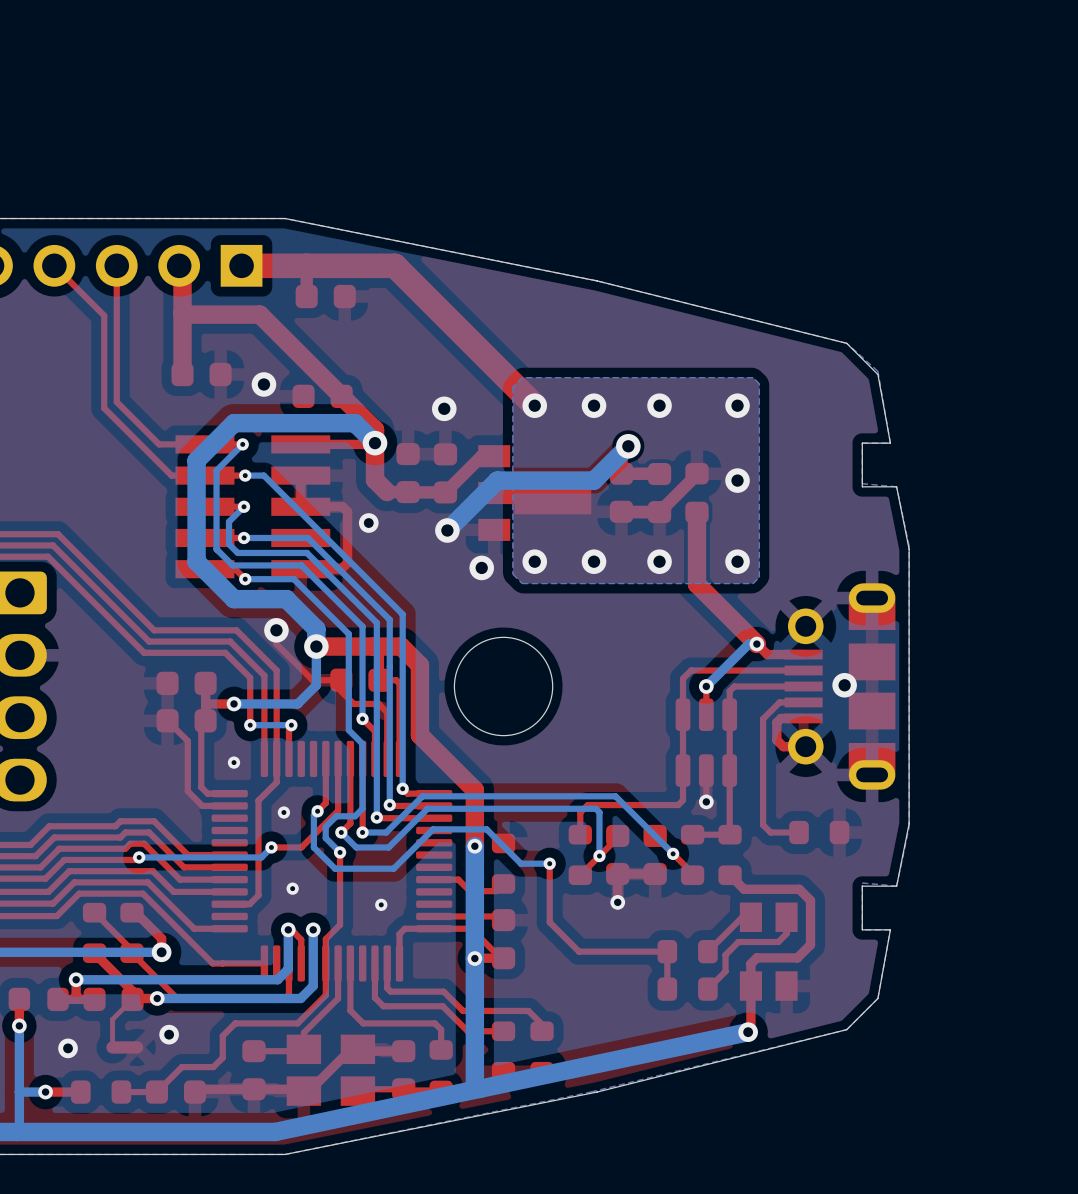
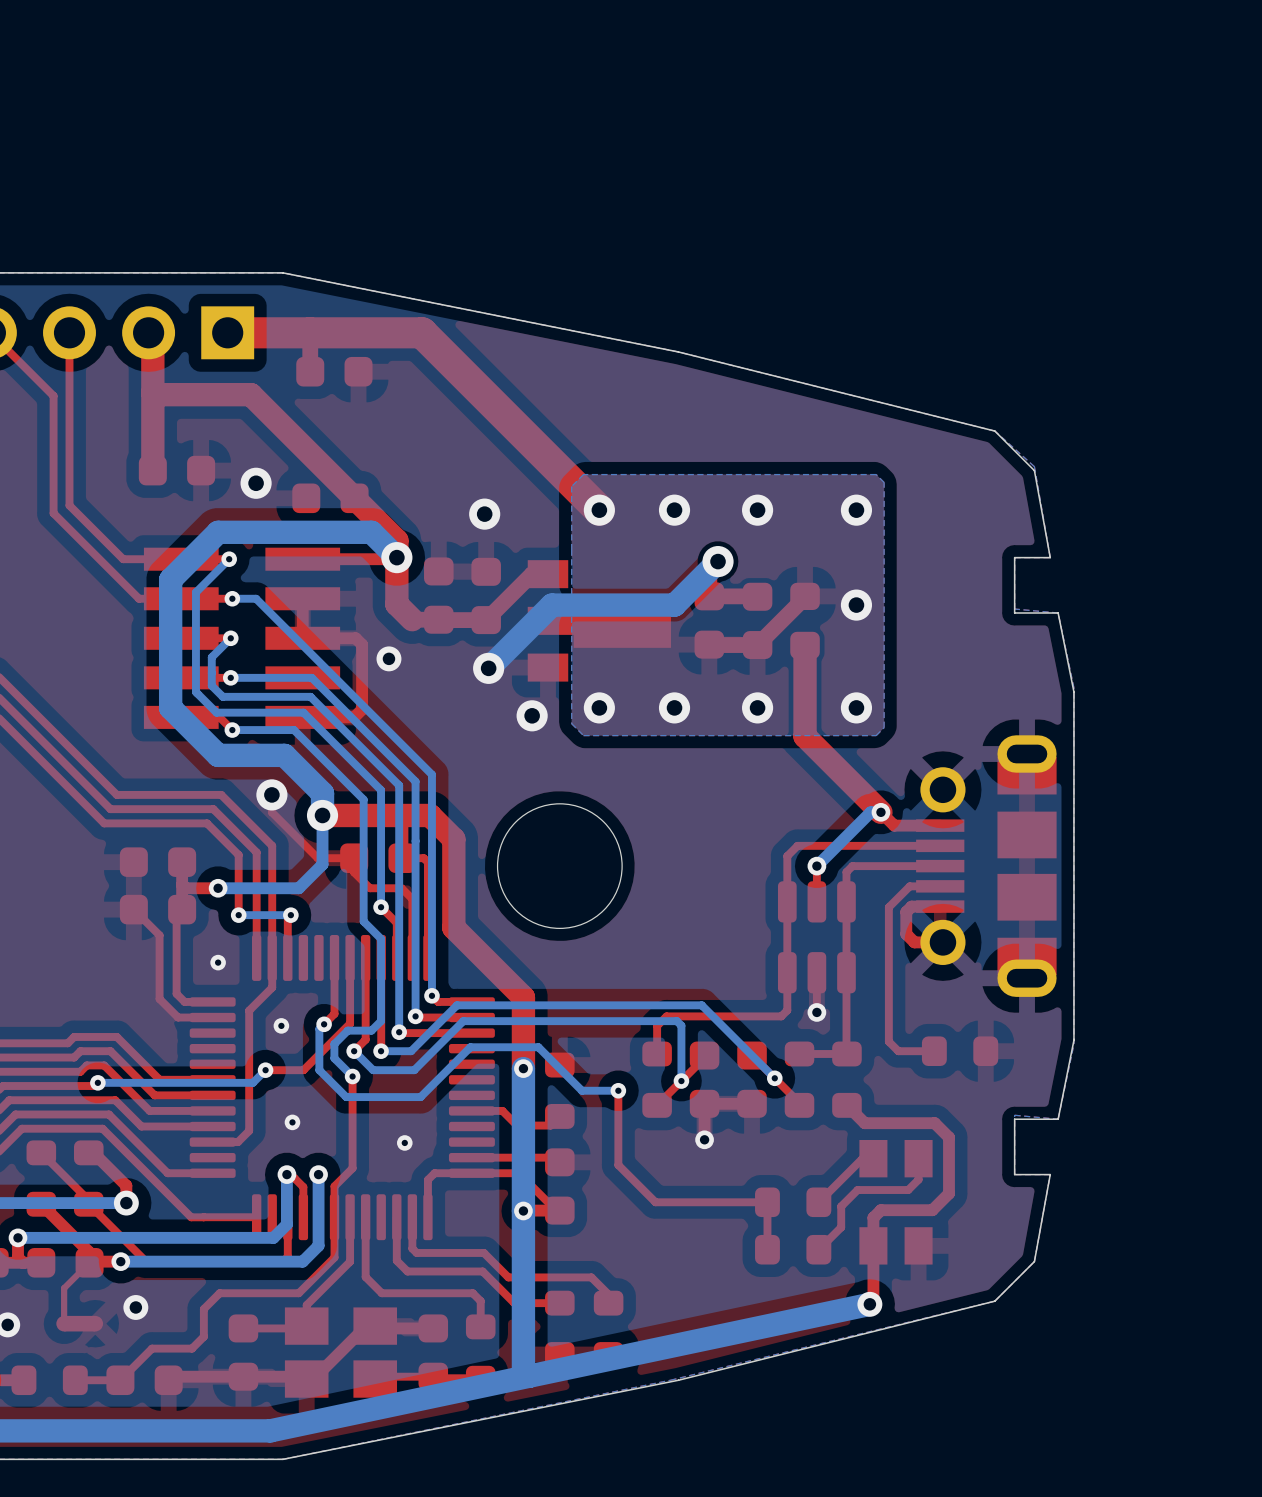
via: (844, 685) -> none

